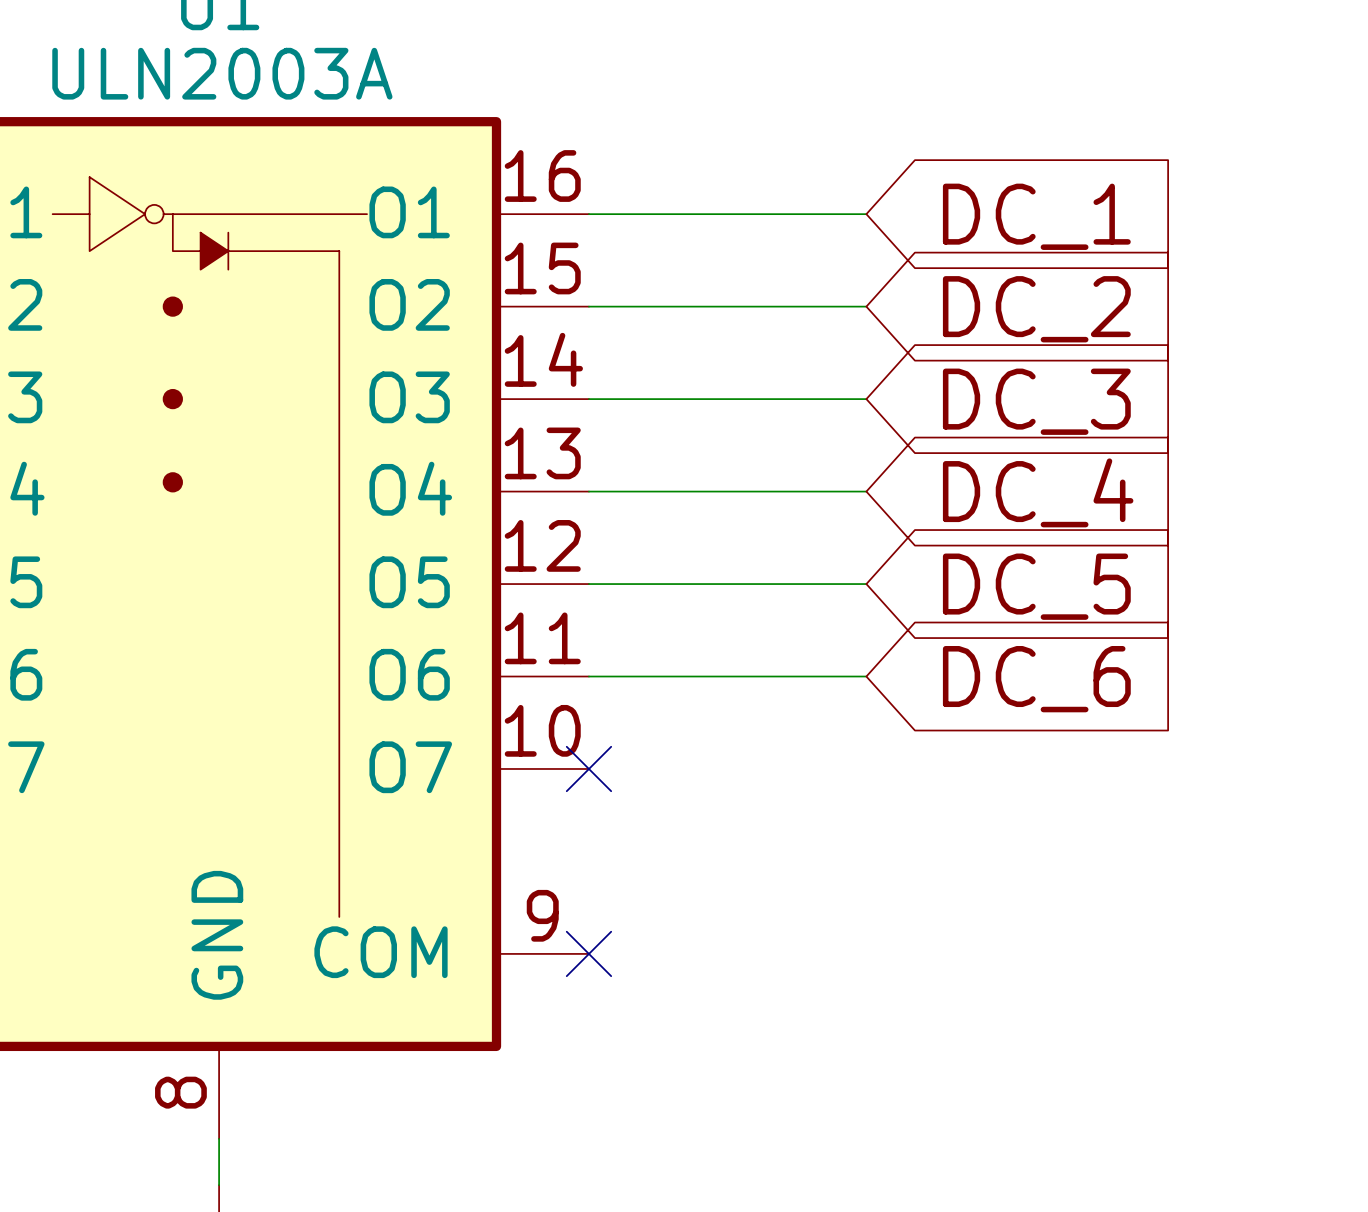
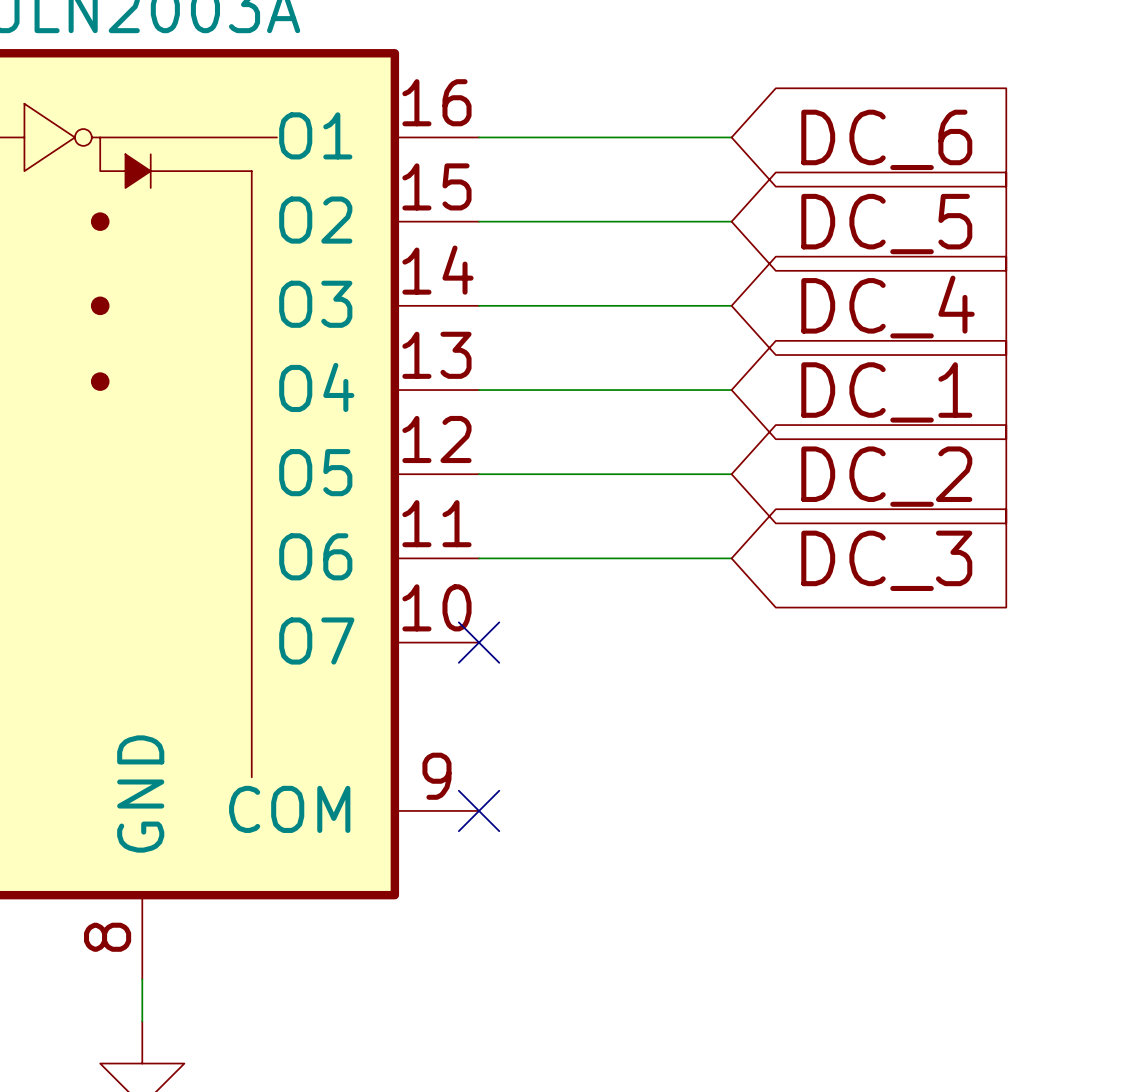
global label: DC_1 (1036, 216) -> DC_6 (886, 139)
global label: DC_2 (1036, 309) -> DC_5 (886, 224)
global label: DC_3 (1036, 401) -> DC_4 (887, 307)
global label: DC_4 (1038, 492) -> DC_1 (886, 392)
global label: DC_5 (1036, 586) -> DC_2 (886, 476)
global label: DC_6 (1036, 679) -> DC_3 (886, 560)

